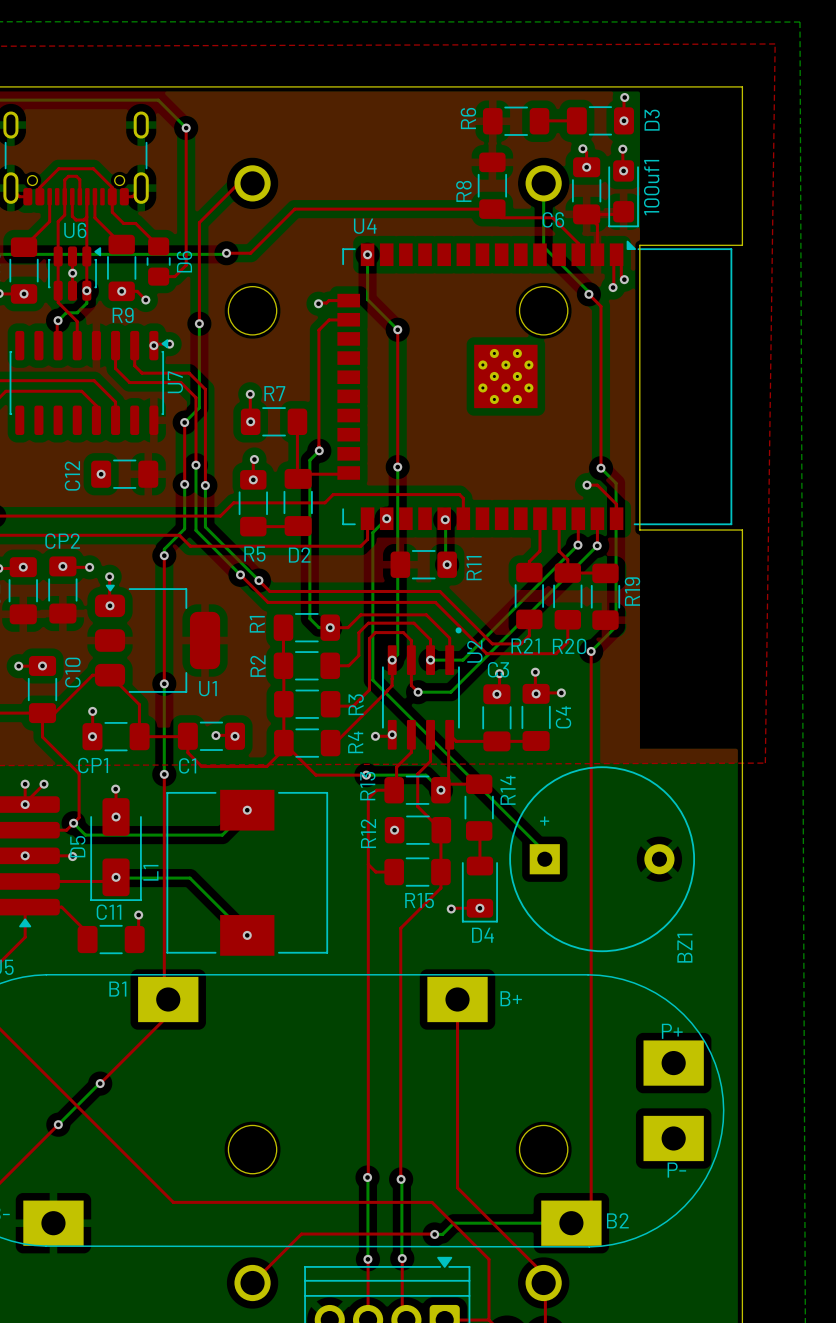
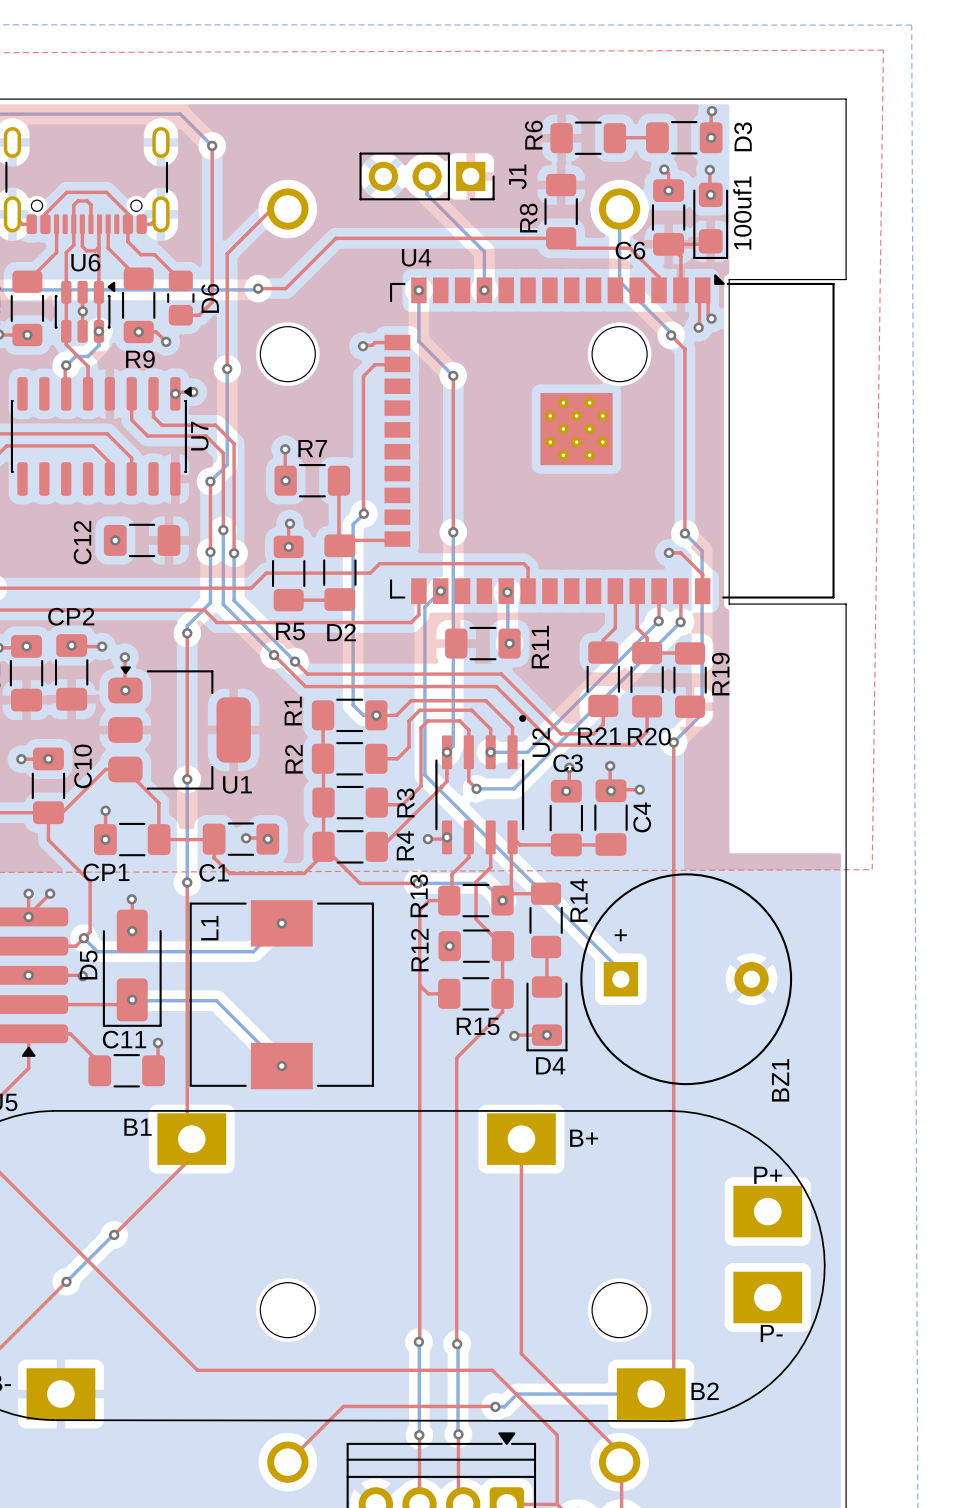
bottom track: none -> (427, 176) (427, 194) (484, 251) (484, 290)
J1: none -> (427, 176)
via: none -> (484, 290)
L1 name position: L1 (150, 872) -> L1 (209, 928)

